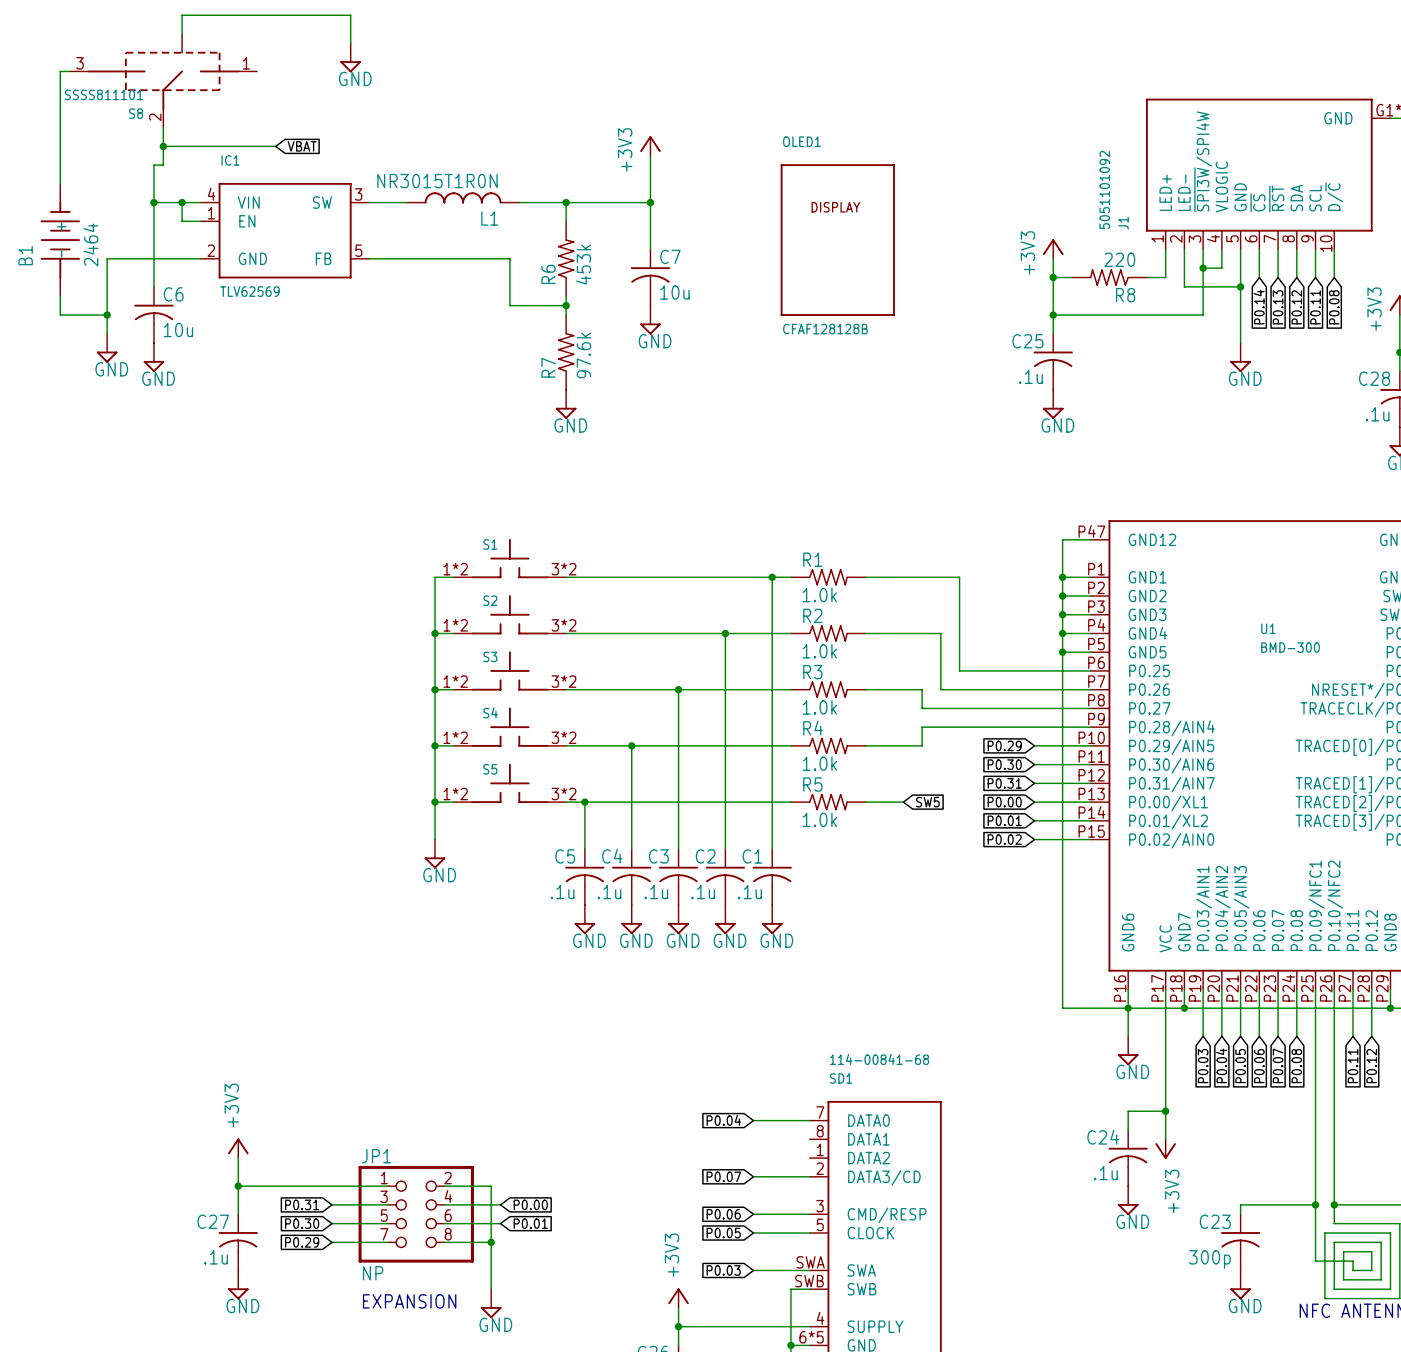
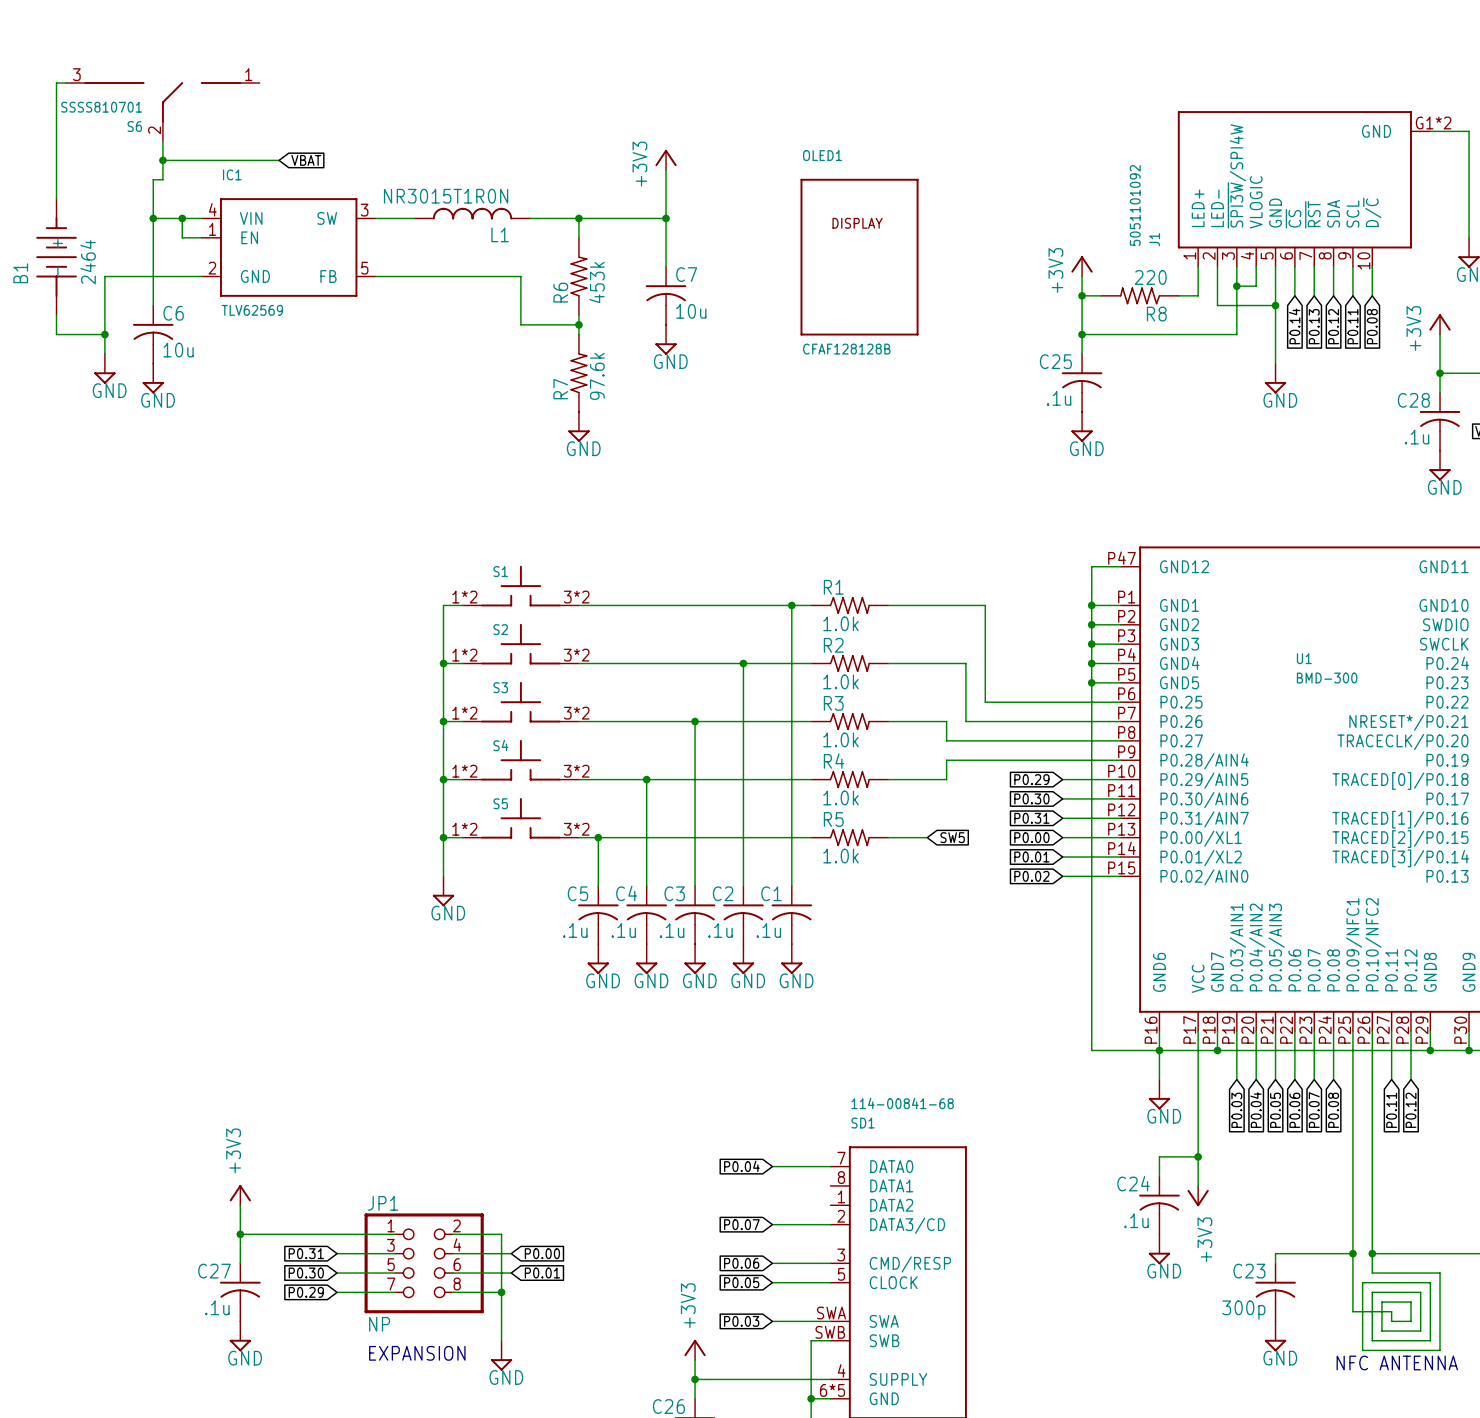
wire: (182, 33) (182, 15) (350, 15) (350, 43) -> none
power symbol: GND (350, 57) -> none
S8: SSSS811101 (163, 80) -> none
S6: none -> SSSS810701 (162, 111)

